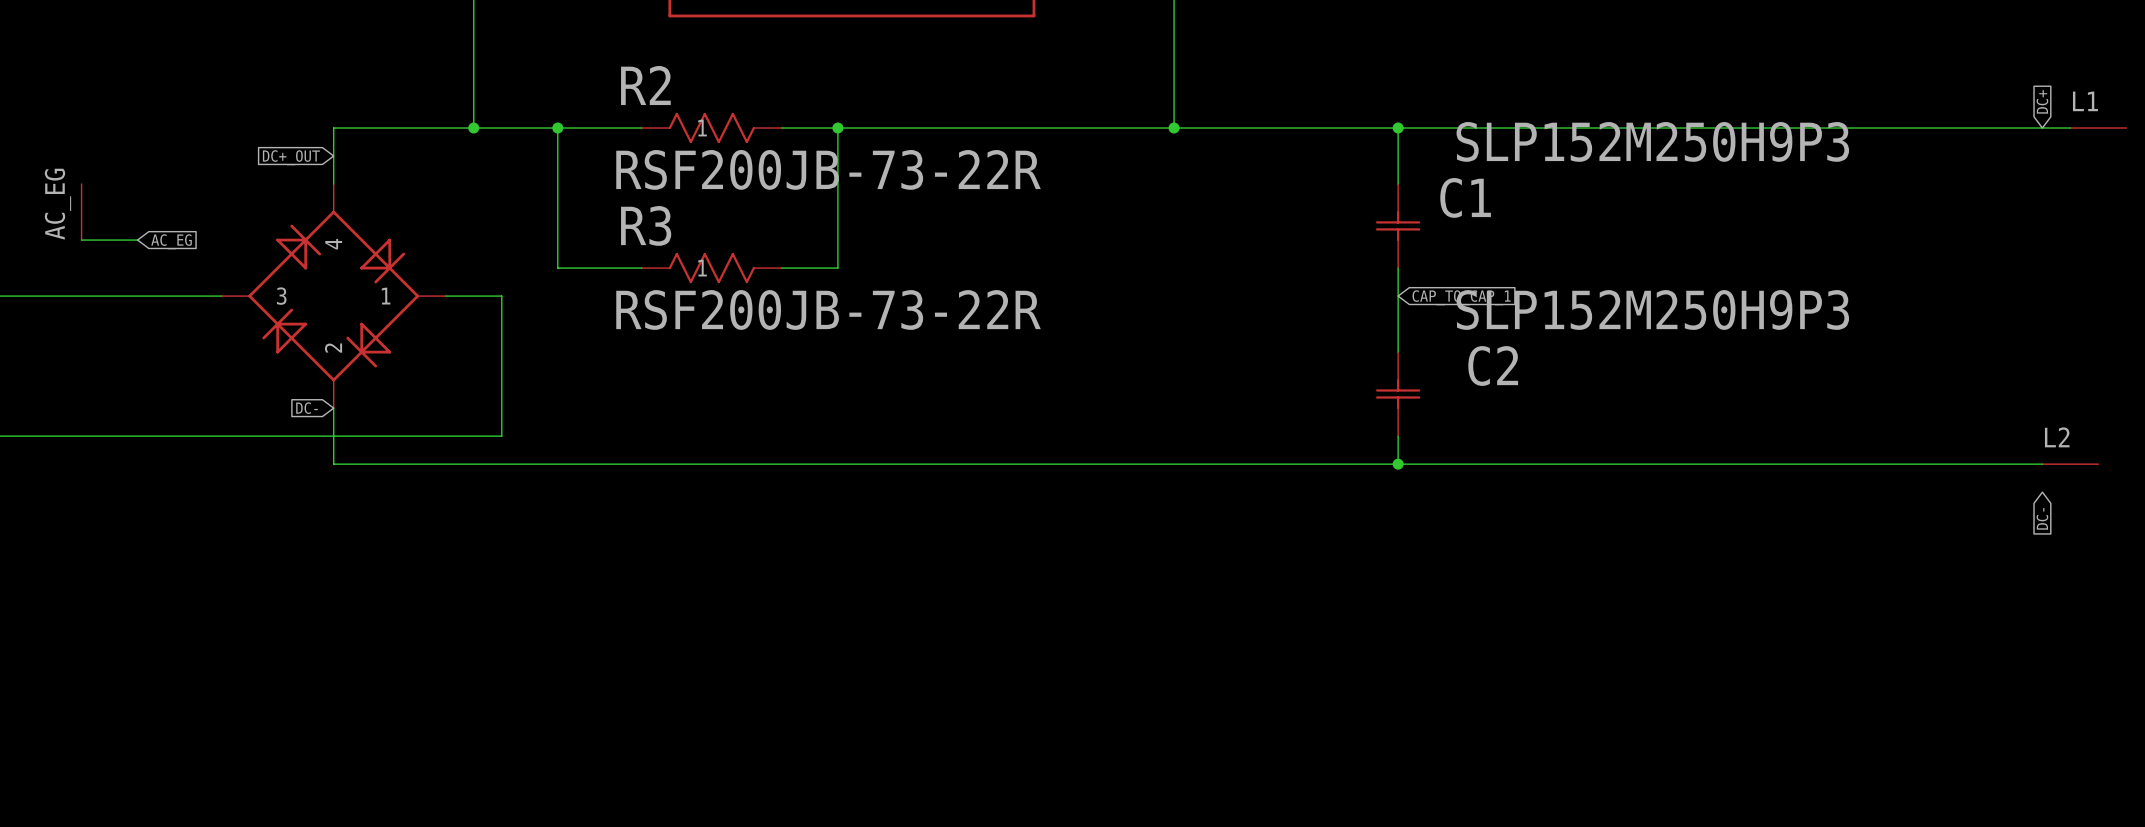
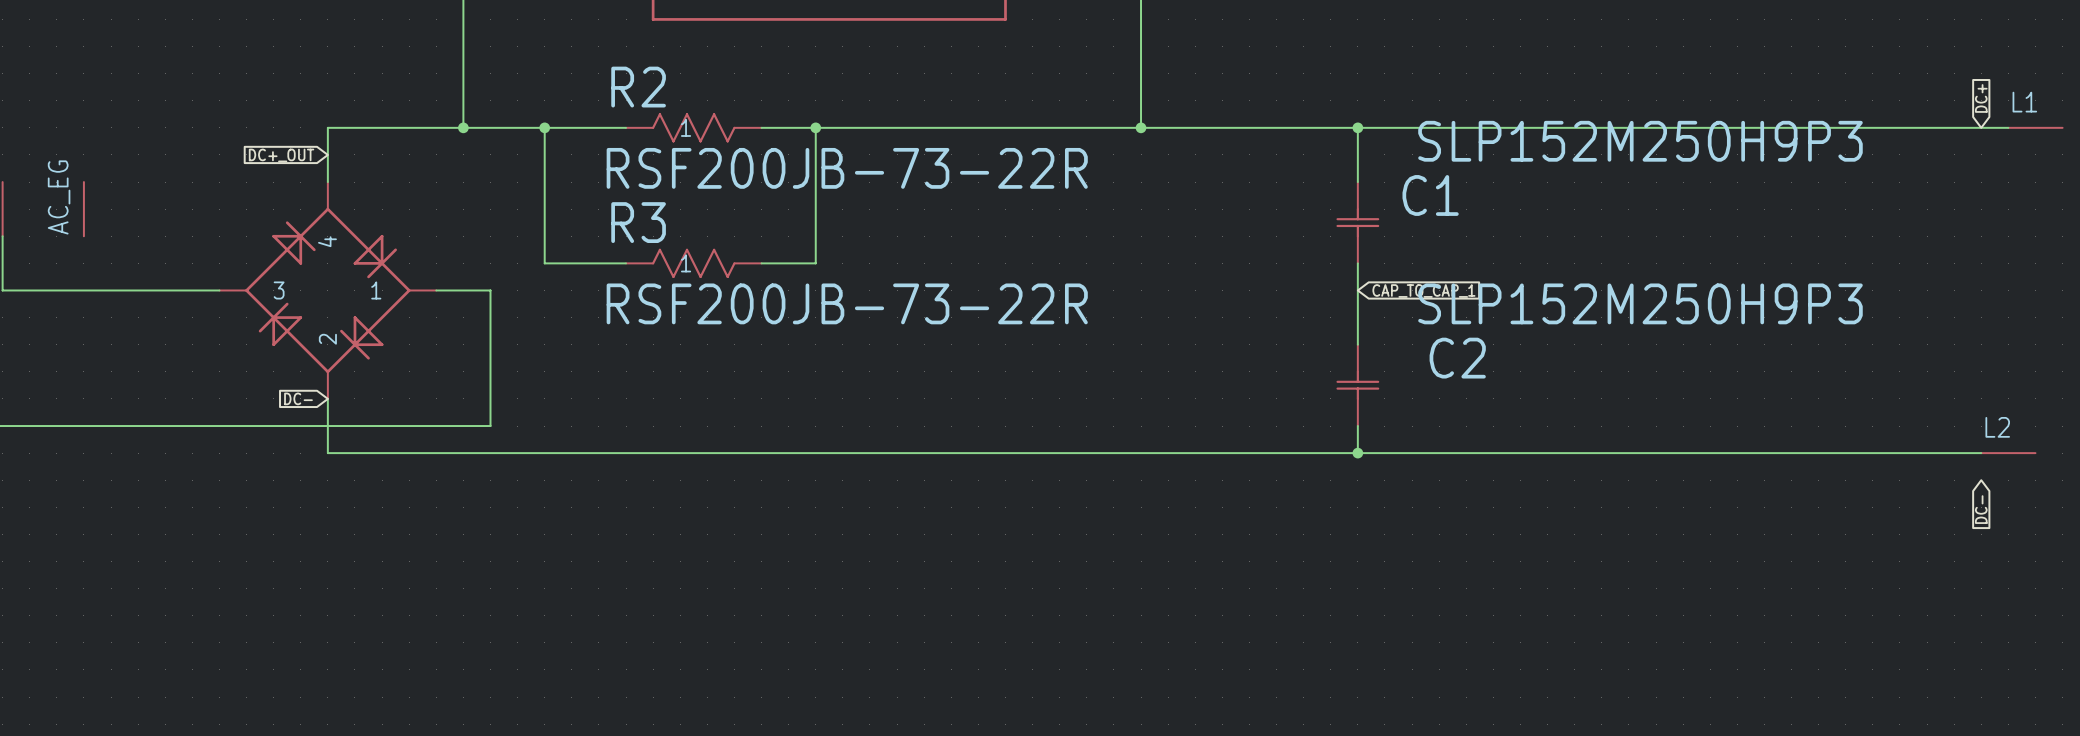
wire: (81, 240) (137, 240) -> none
global label: AC_EG (171, 241) -> none

